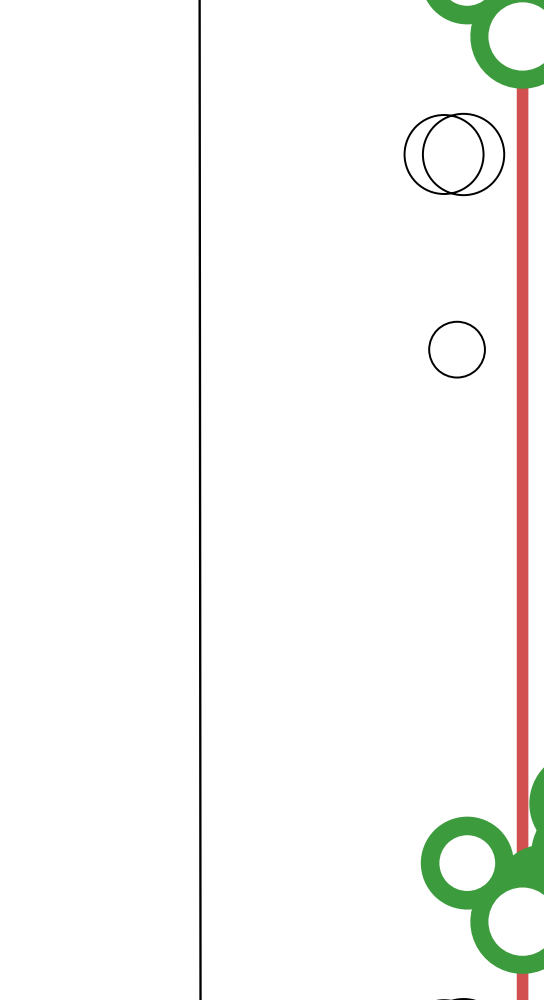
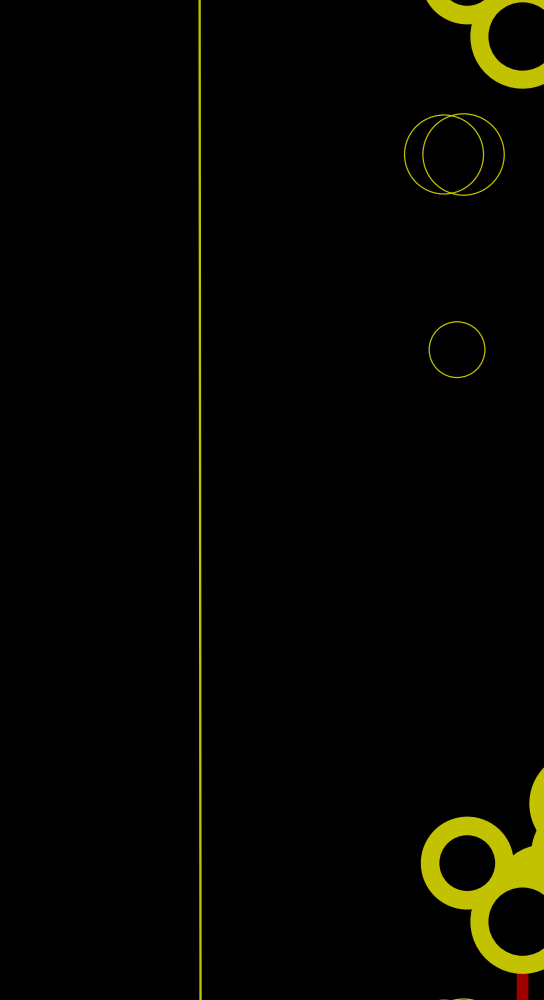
top track: (522, 36) (522, 921) -> none

